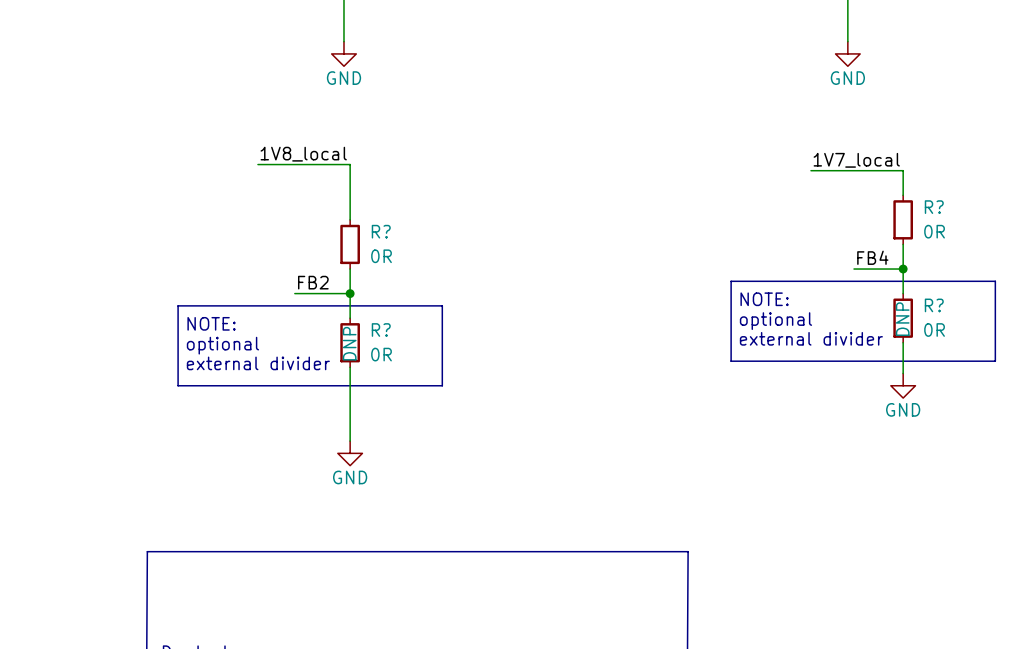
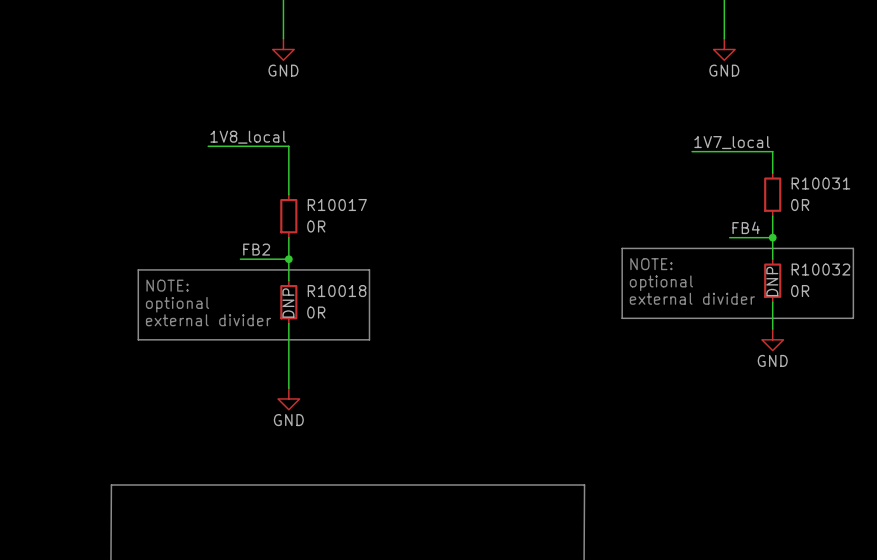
R? name: R? (934, 207) -> R10031 (820, 183)
R? name: R? (381, 231) -> R10017 (337, 205)
R? name: R? (934, 305) -> R10032 (820, 269)
R? name: R? (381, 330) -> R10018 (337, 291)

